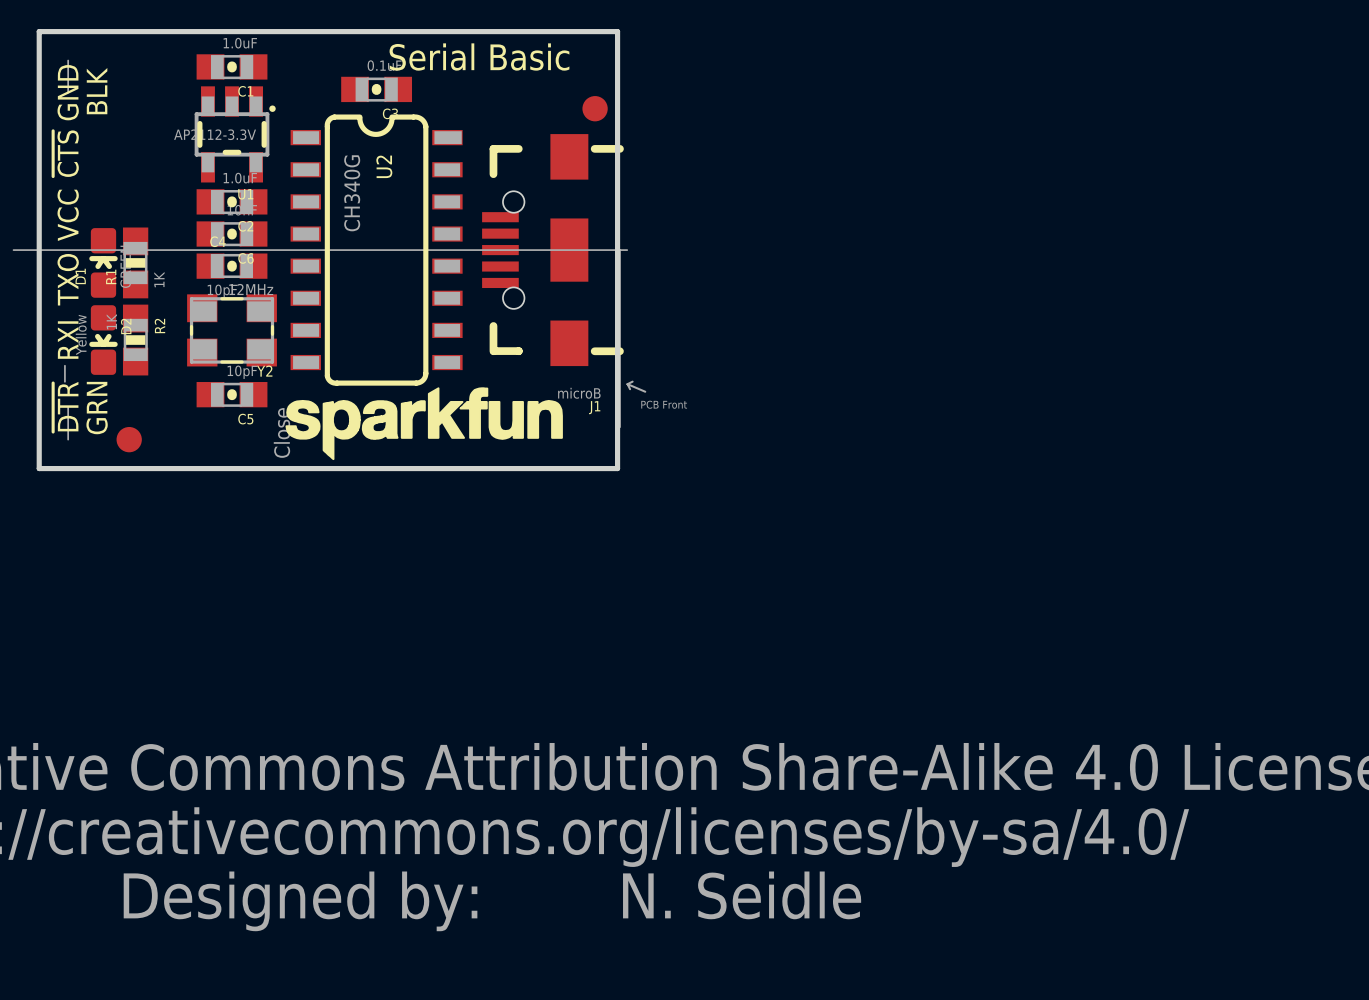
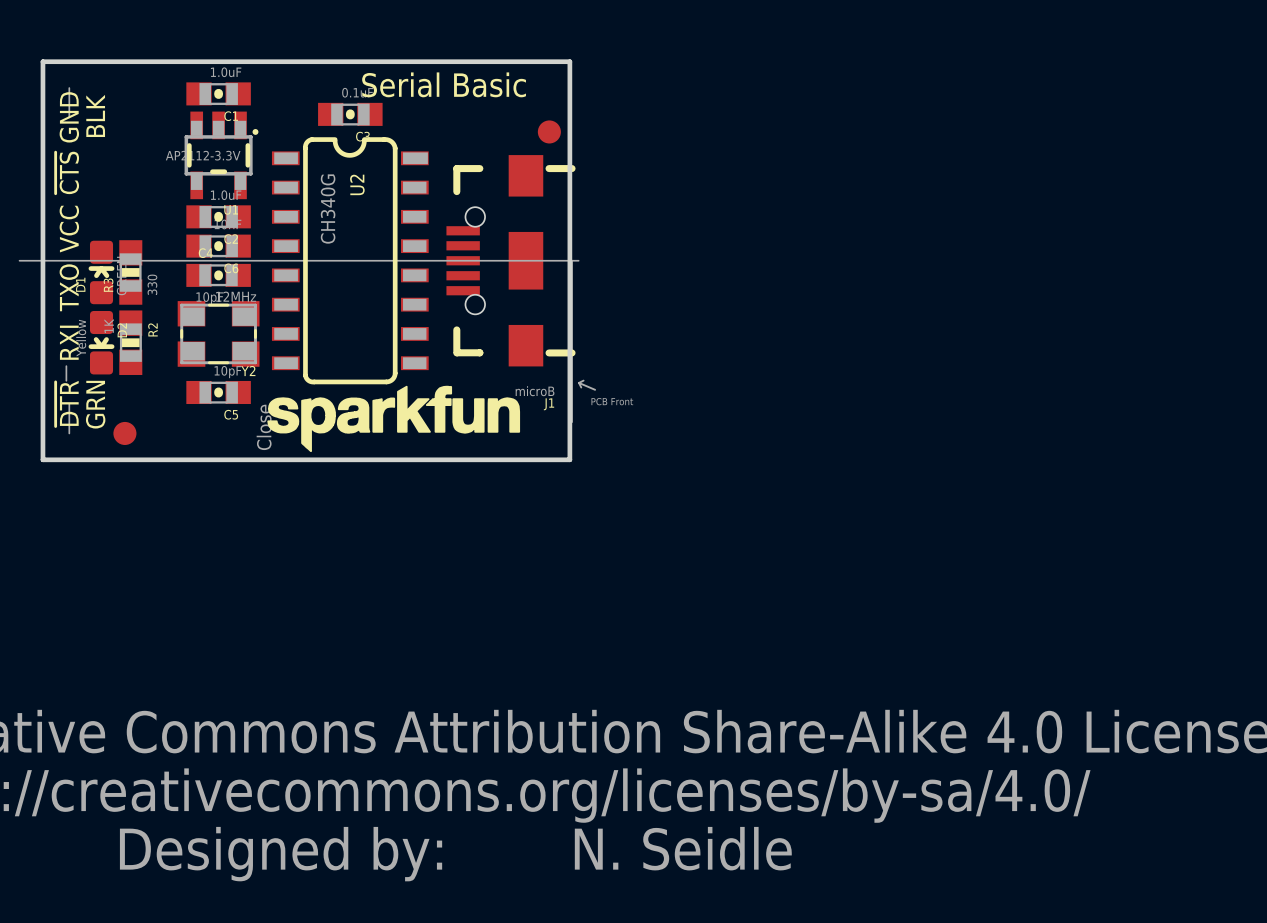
R1 name: R1 (111, 276) -> R3 (108, 285)
R1 value: 1K (159, 279) -> 330 (152, 284)

